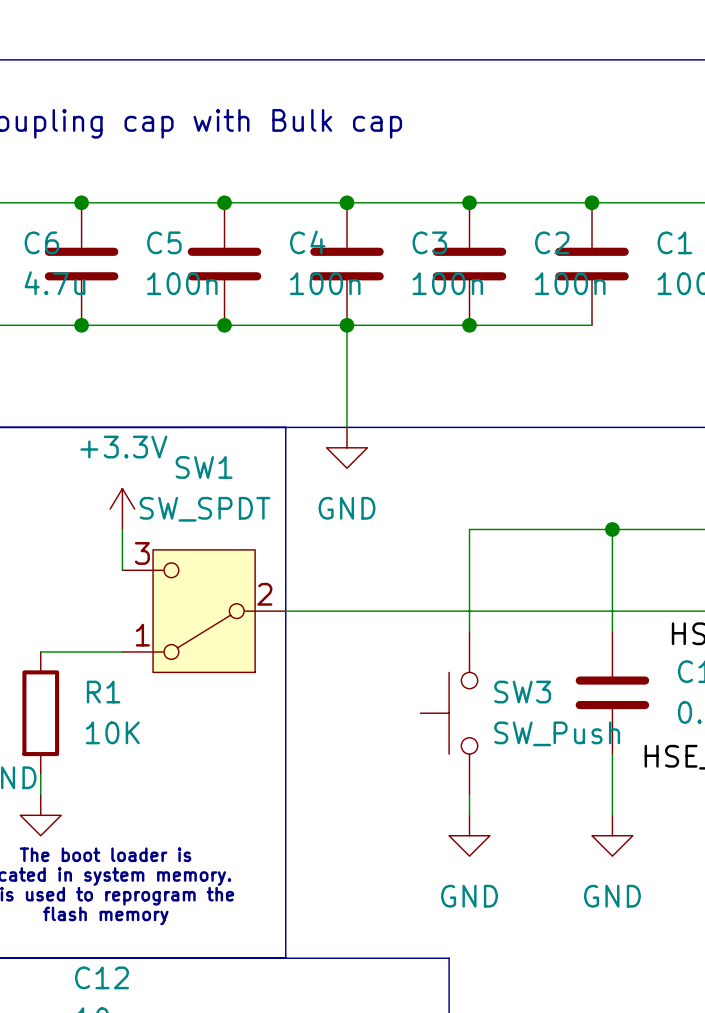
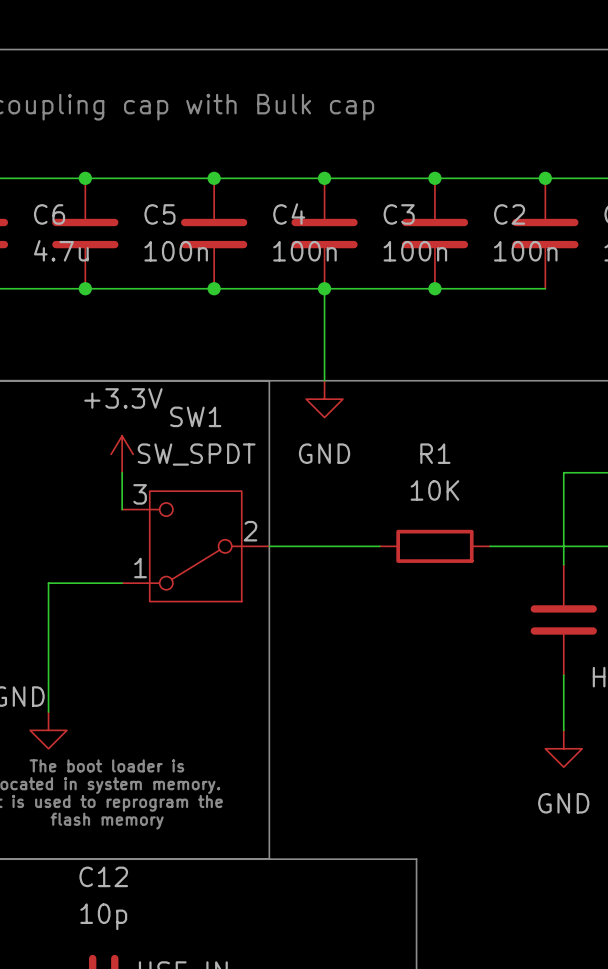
wire: (612, 529) (469, 529) (469, 631) -> none
junction: (612, 529) -> none
wire: (408, 611) (530, 611) -> none
wire: none -> (48, 583) (48, 693)
R1 name position: R1 (103, 692) -> R1 (435, 453)
R1 rotation: 0° (40, 713) -> 90° clockwise (434, 546)
R1 position: (40, 713) -> (434, 546)
SW3: SW_Push (449, 713) -> none
R1 value position: 10K (112, 732) -> 10K (434, 490)
wire: (469, 794) (469, 815) -> none
power symbol: GND (469, 835) -> none

